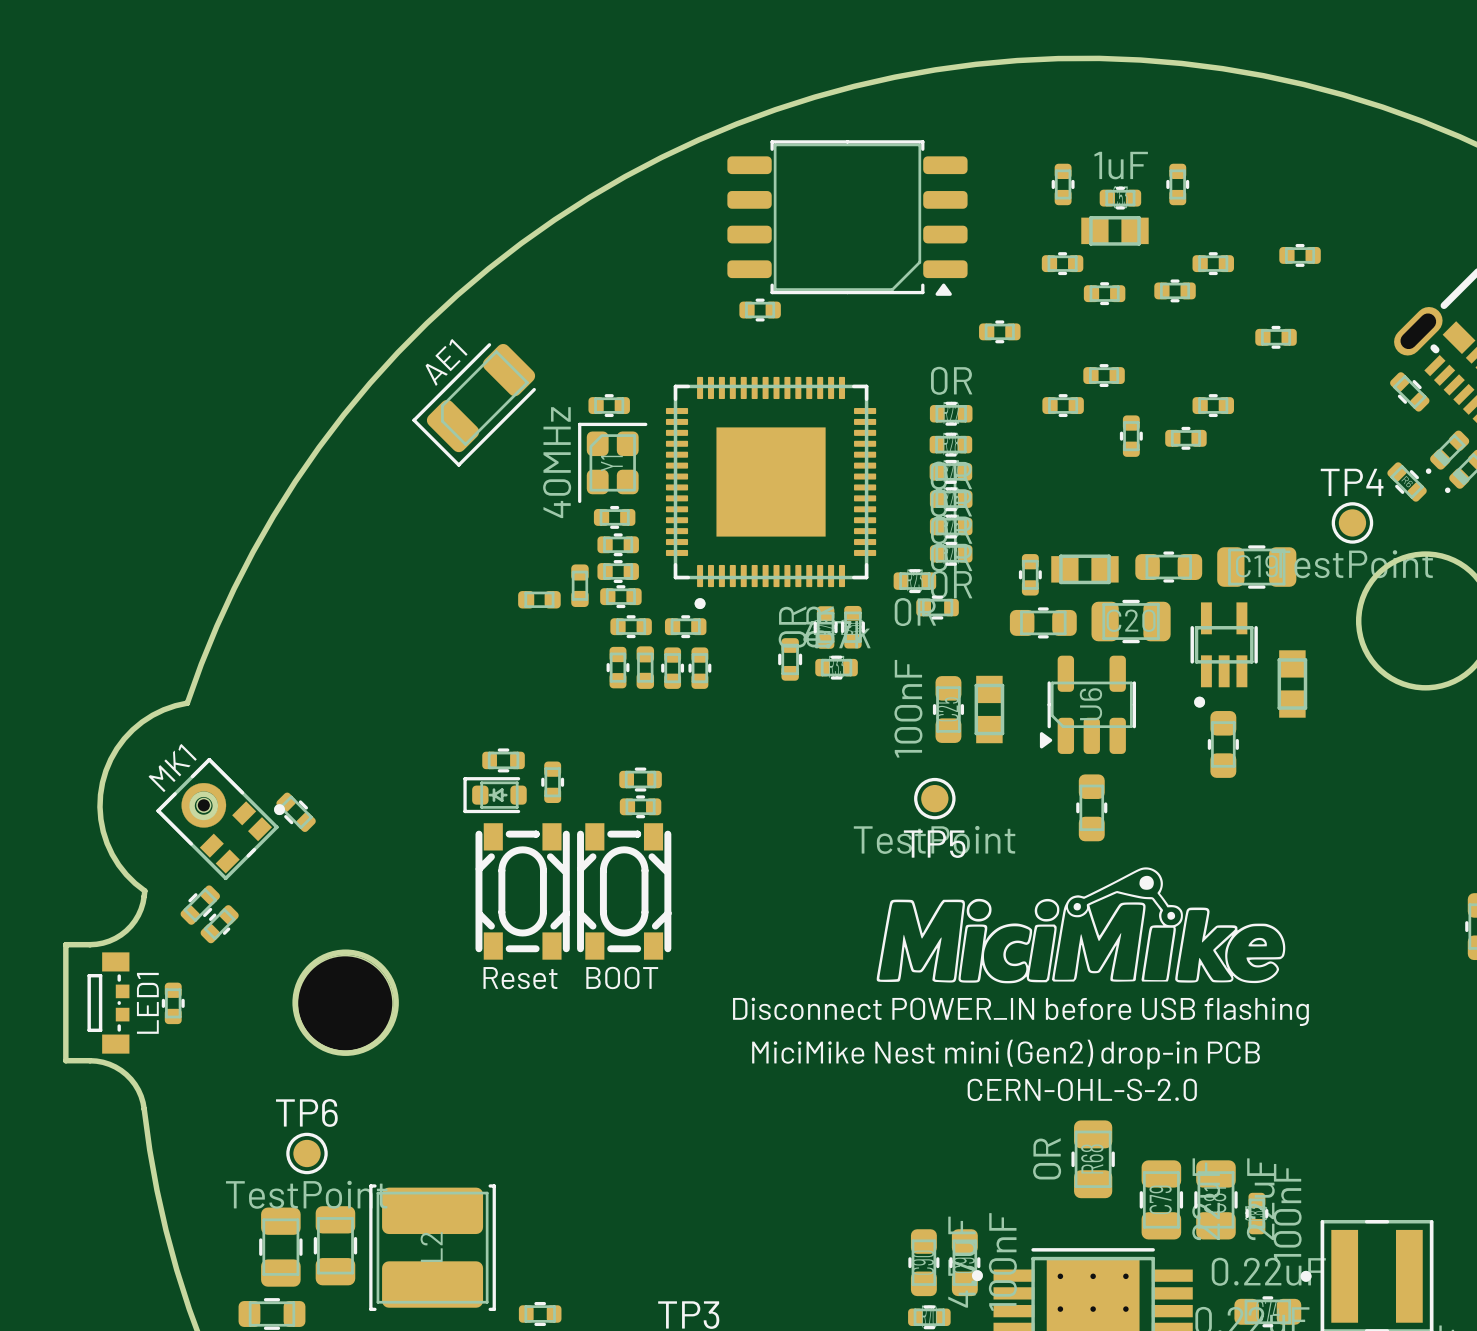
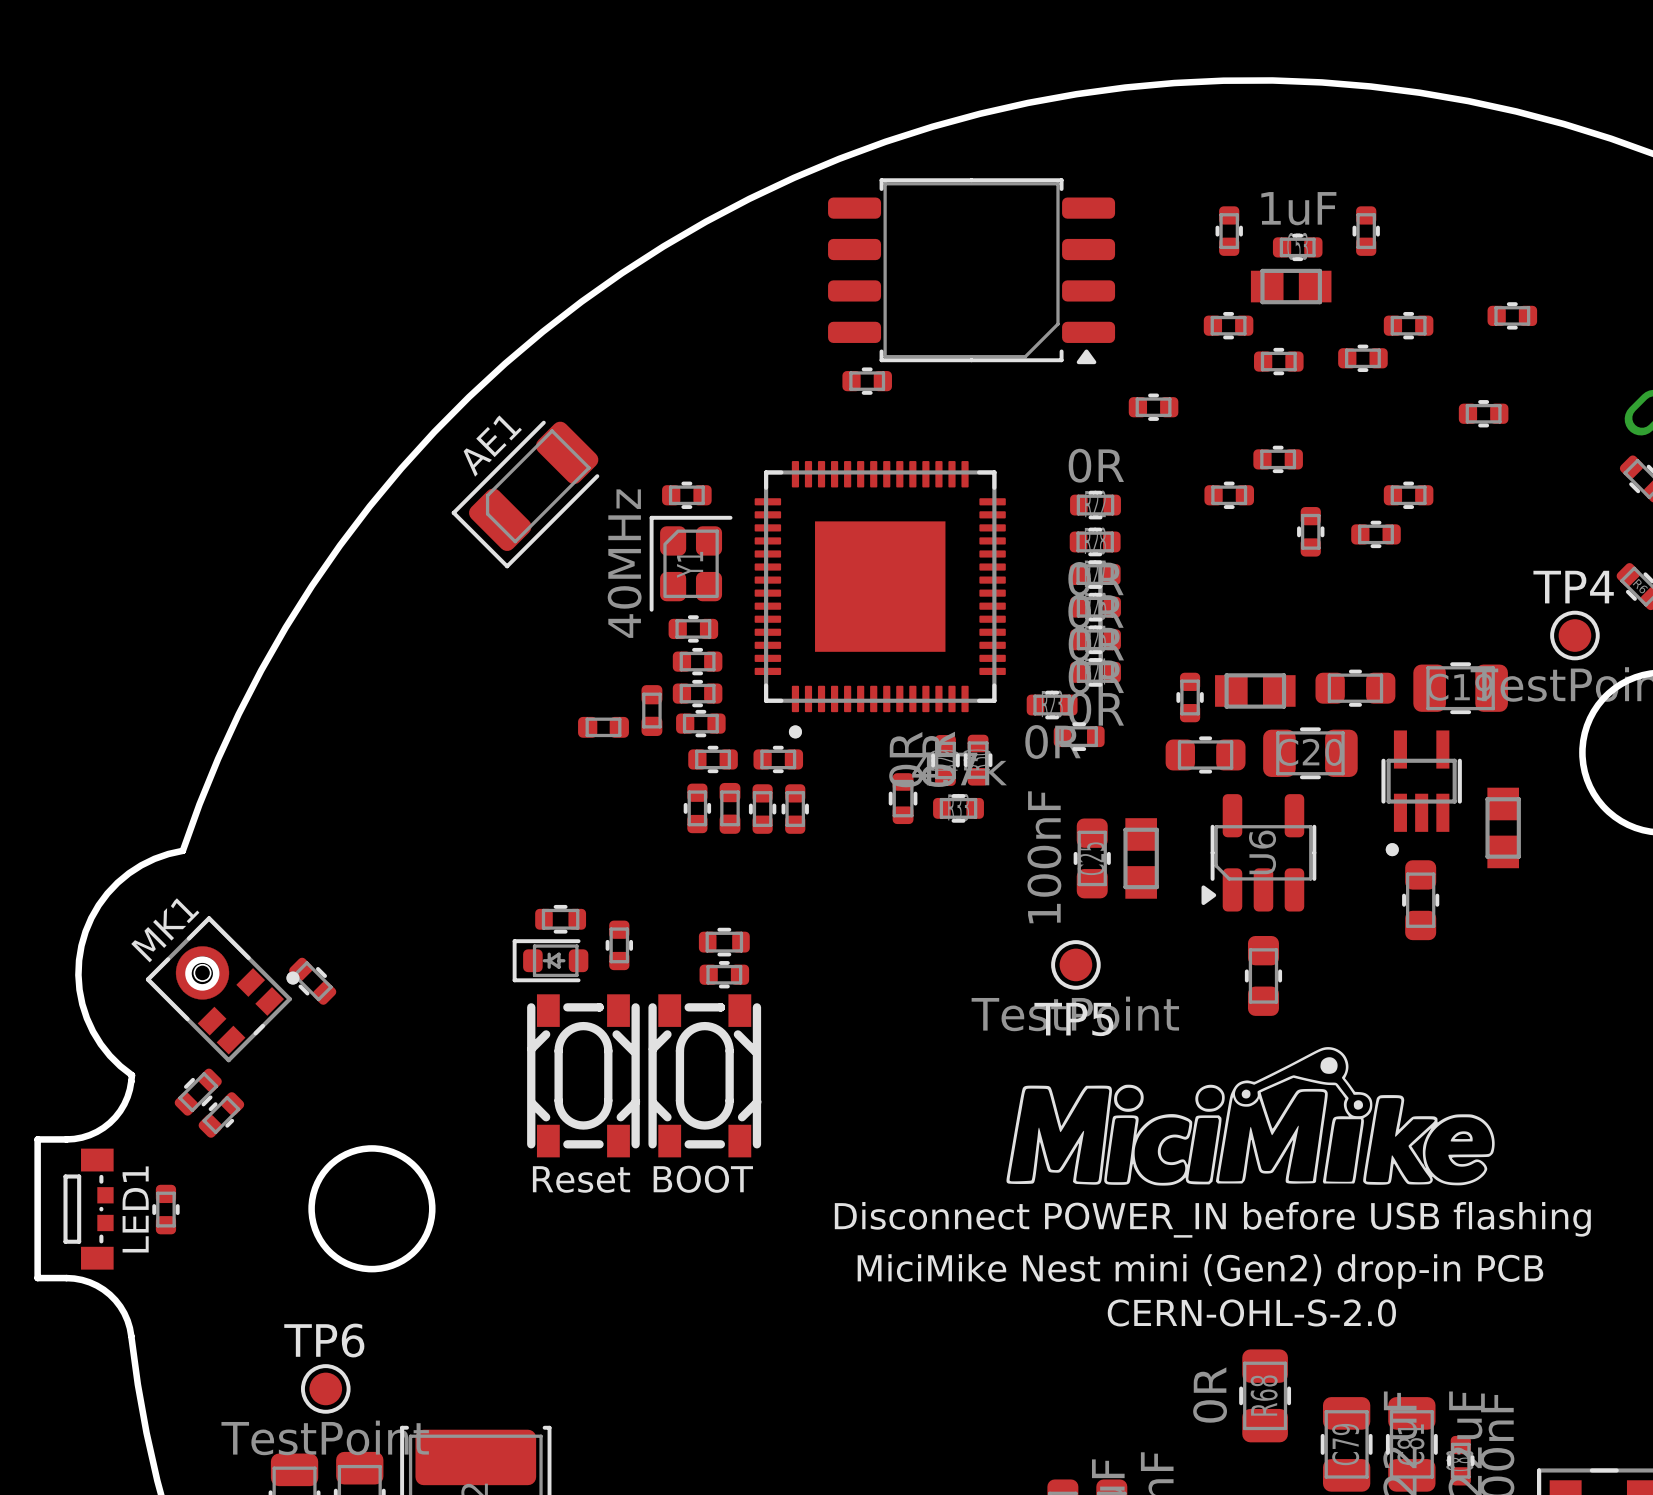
part: (345, 1003) -> none

